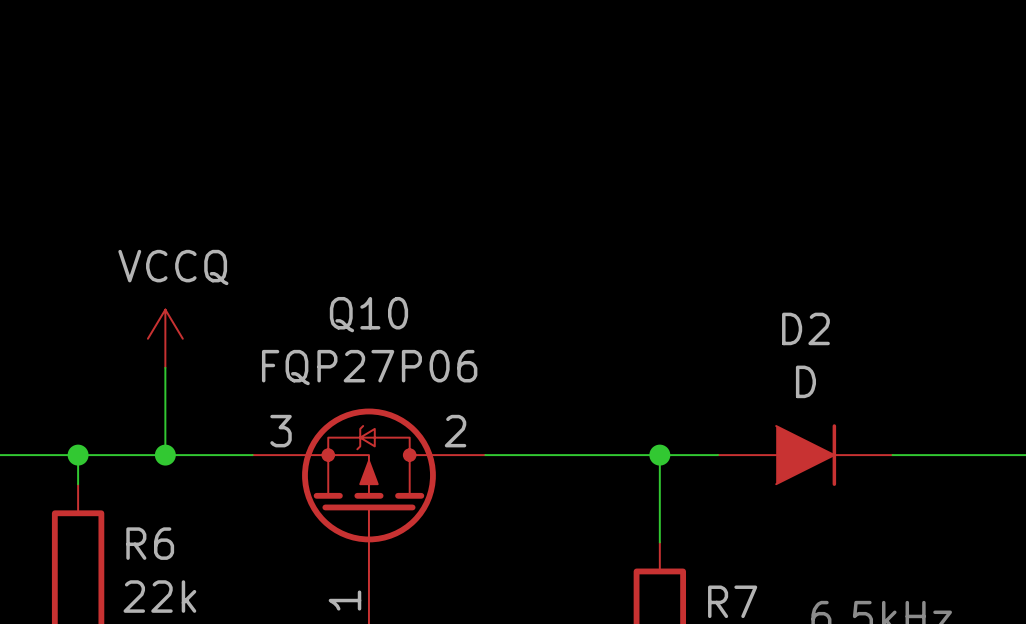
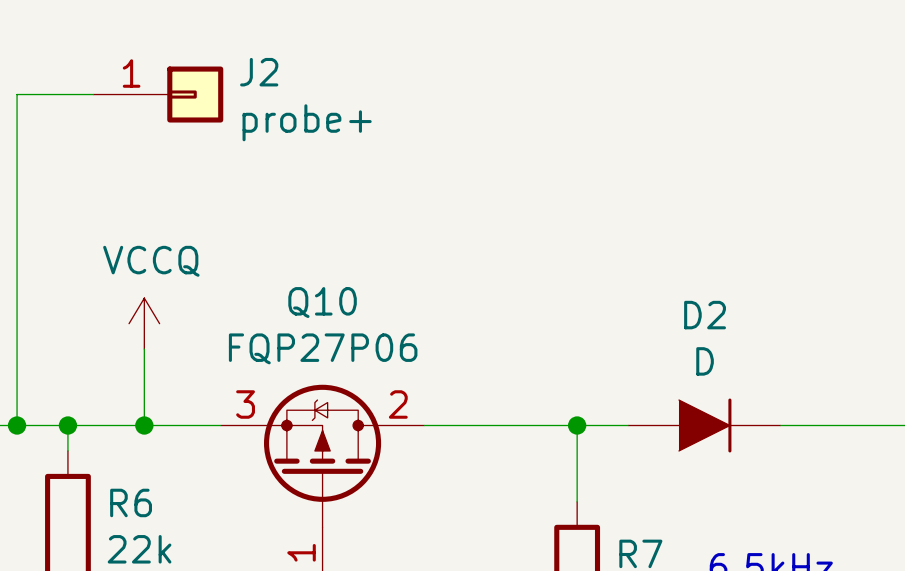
wire: none -> (93, 94) (17, 94) (17, 425)
J2: none -> probe+ (158, 94)
junction: none -> (17, 425)

